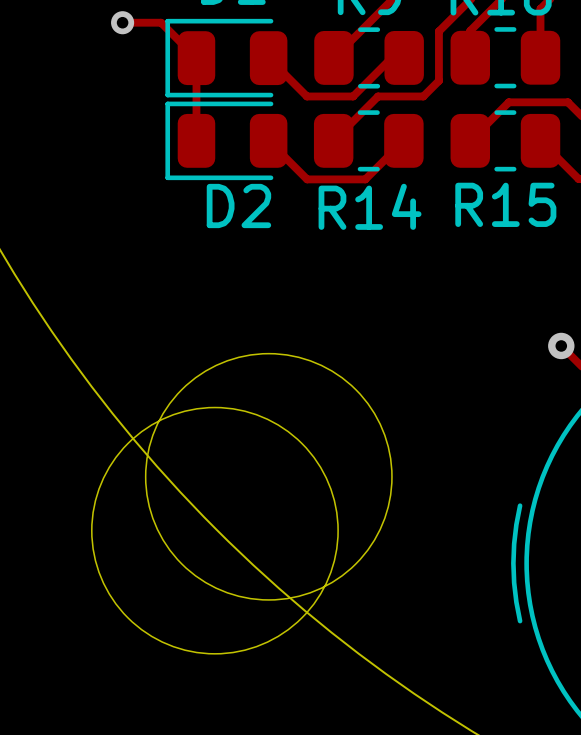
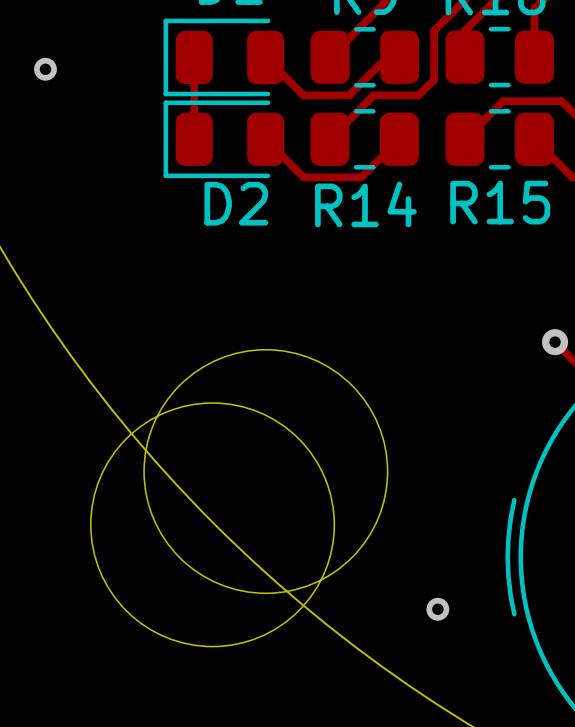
track: (122, 22) (161, 22) (196, 58) -> none
via position: (122, 22) -> (45, 69)
via: none -> (437, 609)

